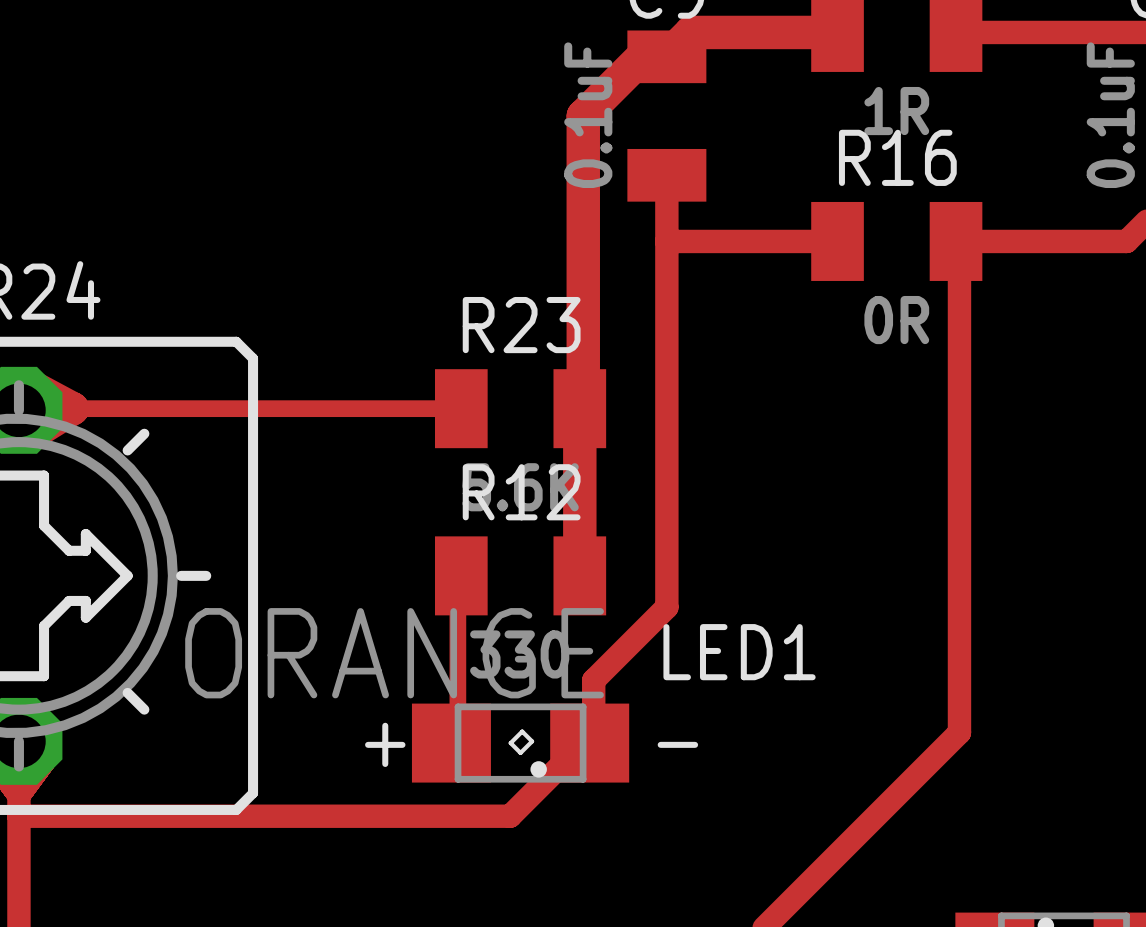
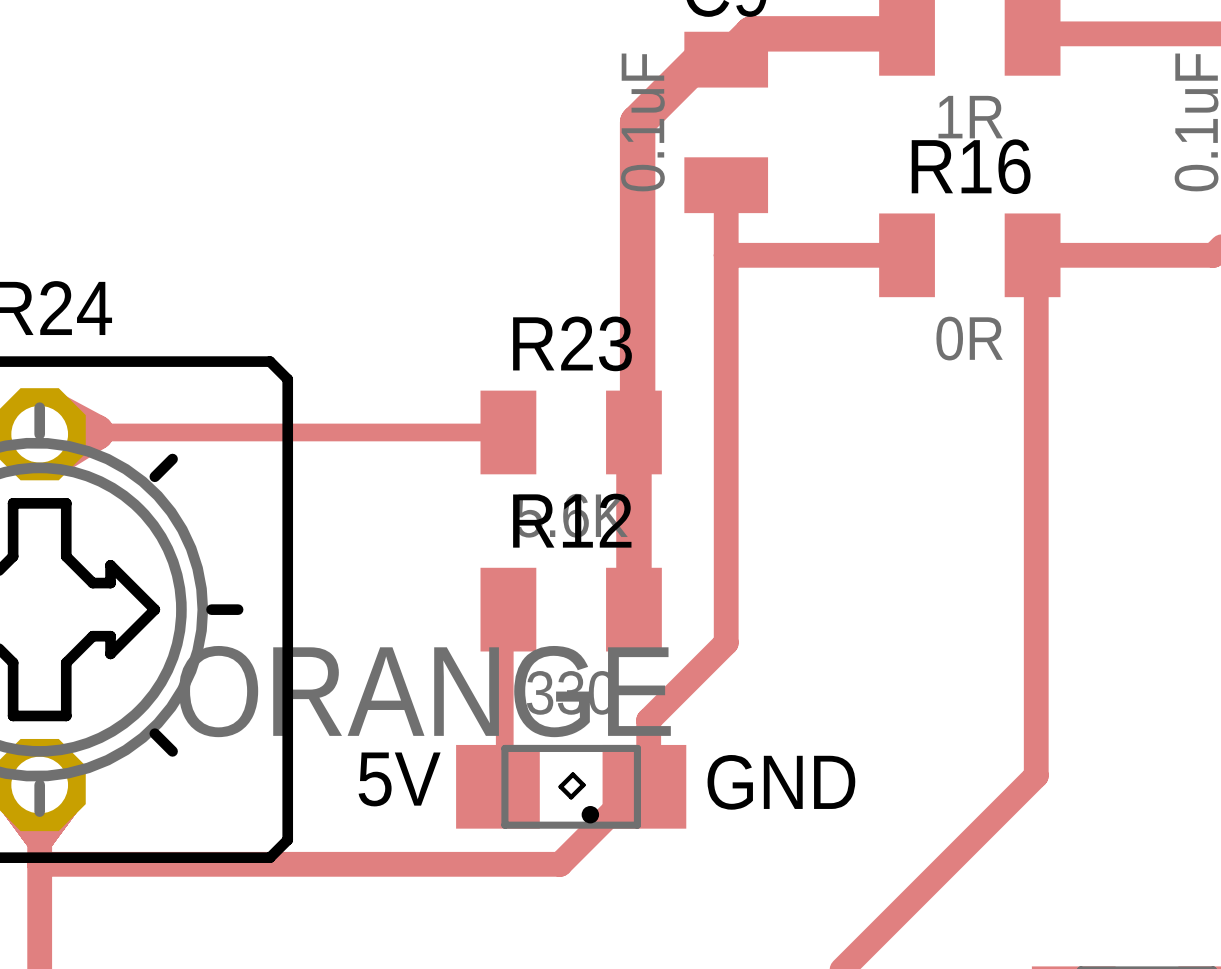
LED1 name: LED1 (739, 652) -> 5V (399, 779)
text: + (385, 744) -> none
text: - (677, 744) -> GND (781, 782)

